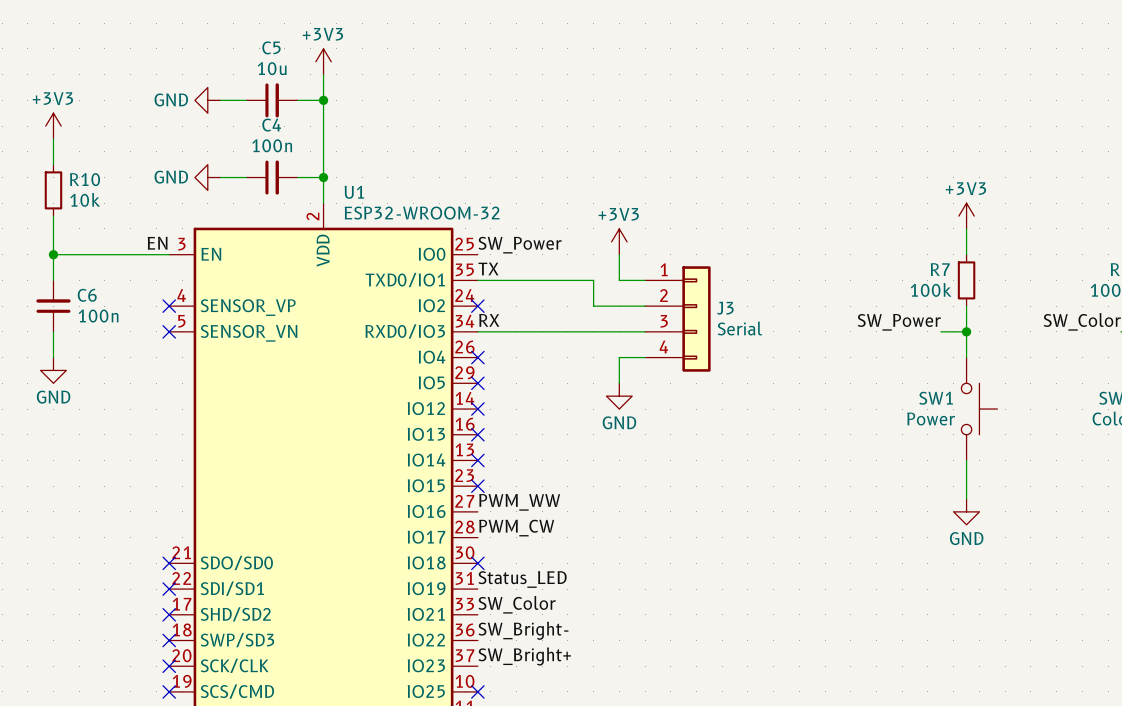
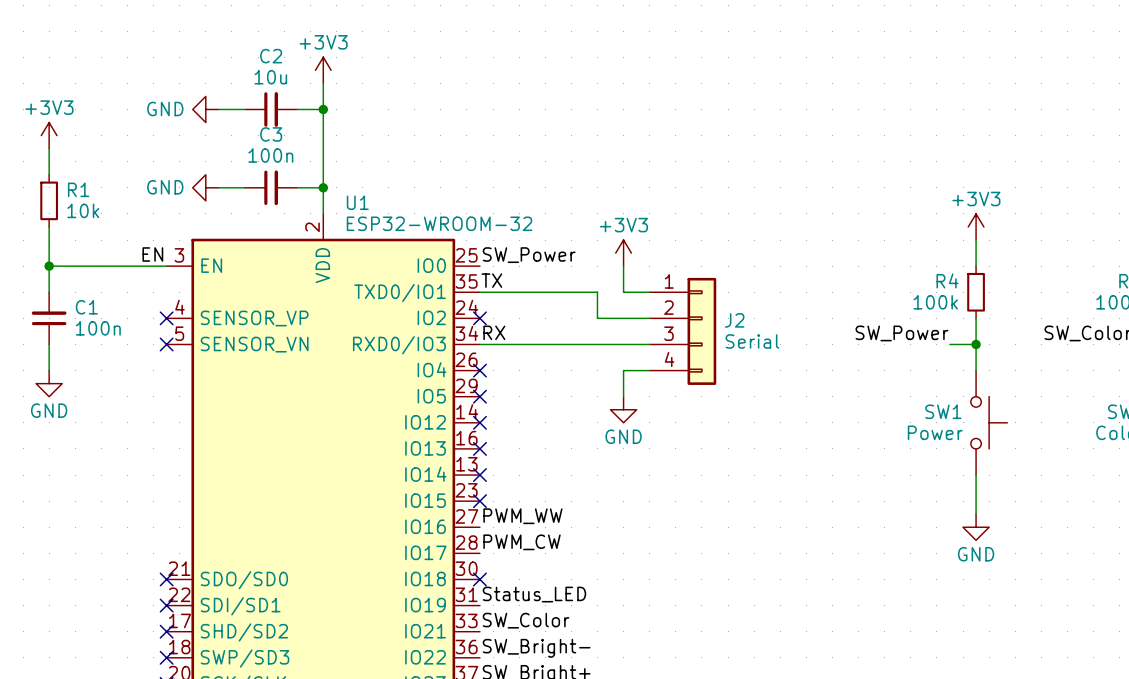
C5 name: C5 (271, 47) -> C2 (271, 56)
C4 name: C4 (271, 125) -> C3 (271, 134)
R10 name: R10 (85, 179) -> R1 (78, 189)
R7 name: R7 (940, 269) -> R4 (947, 280)
C6 name: C6 (87, 295) -> C1 (86, 307)
J3 name: J3 (725, 308) -> J2 (734, 320)

